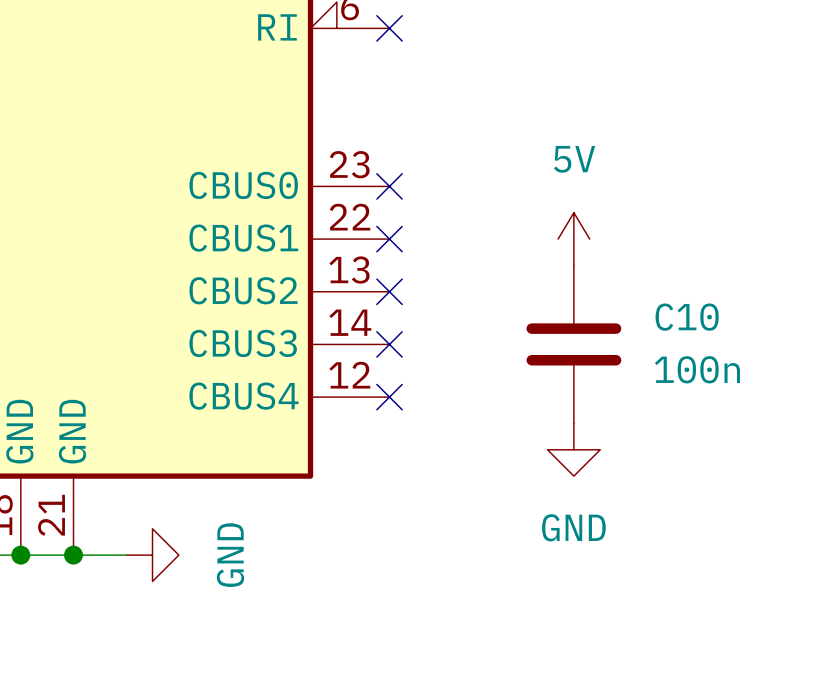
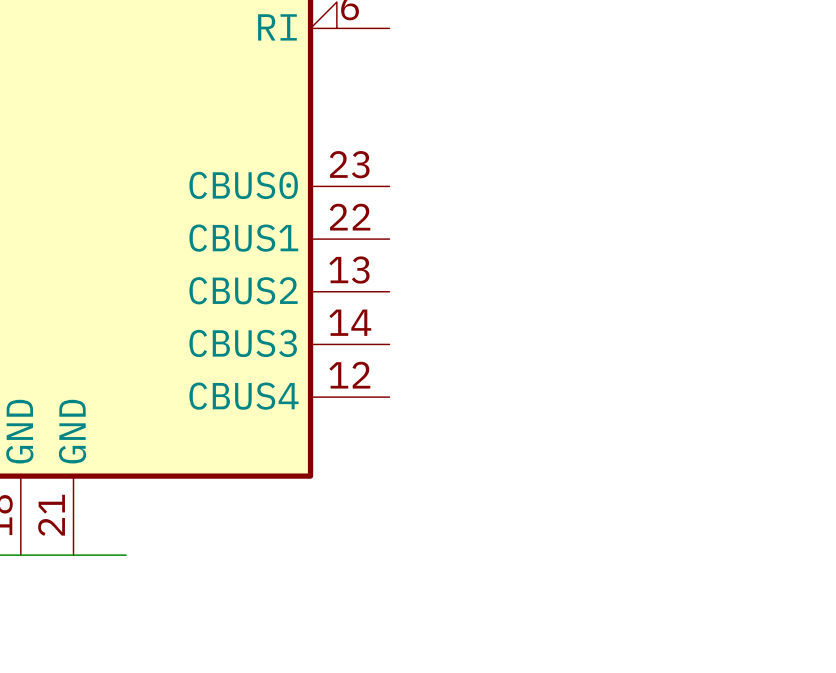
no-connect mark: (389, 28) -> none
no-connect mark: (389, 186) -> none
no-connect mark: (389, 239) -> none
power symbol: 5V (573, 239) -> none
no-connect mark: (389, 291) -> none
no-connect mark: (389, 344) -> none
C10: 100n (573, 344) -> none
no-connect mark: (389, 397) -> none
power symbol: GND (573, 449) -> none
junction: (20, 555) -> none
junction: (73, 555) -> none
power symbol: GND (152, 555) -> none

